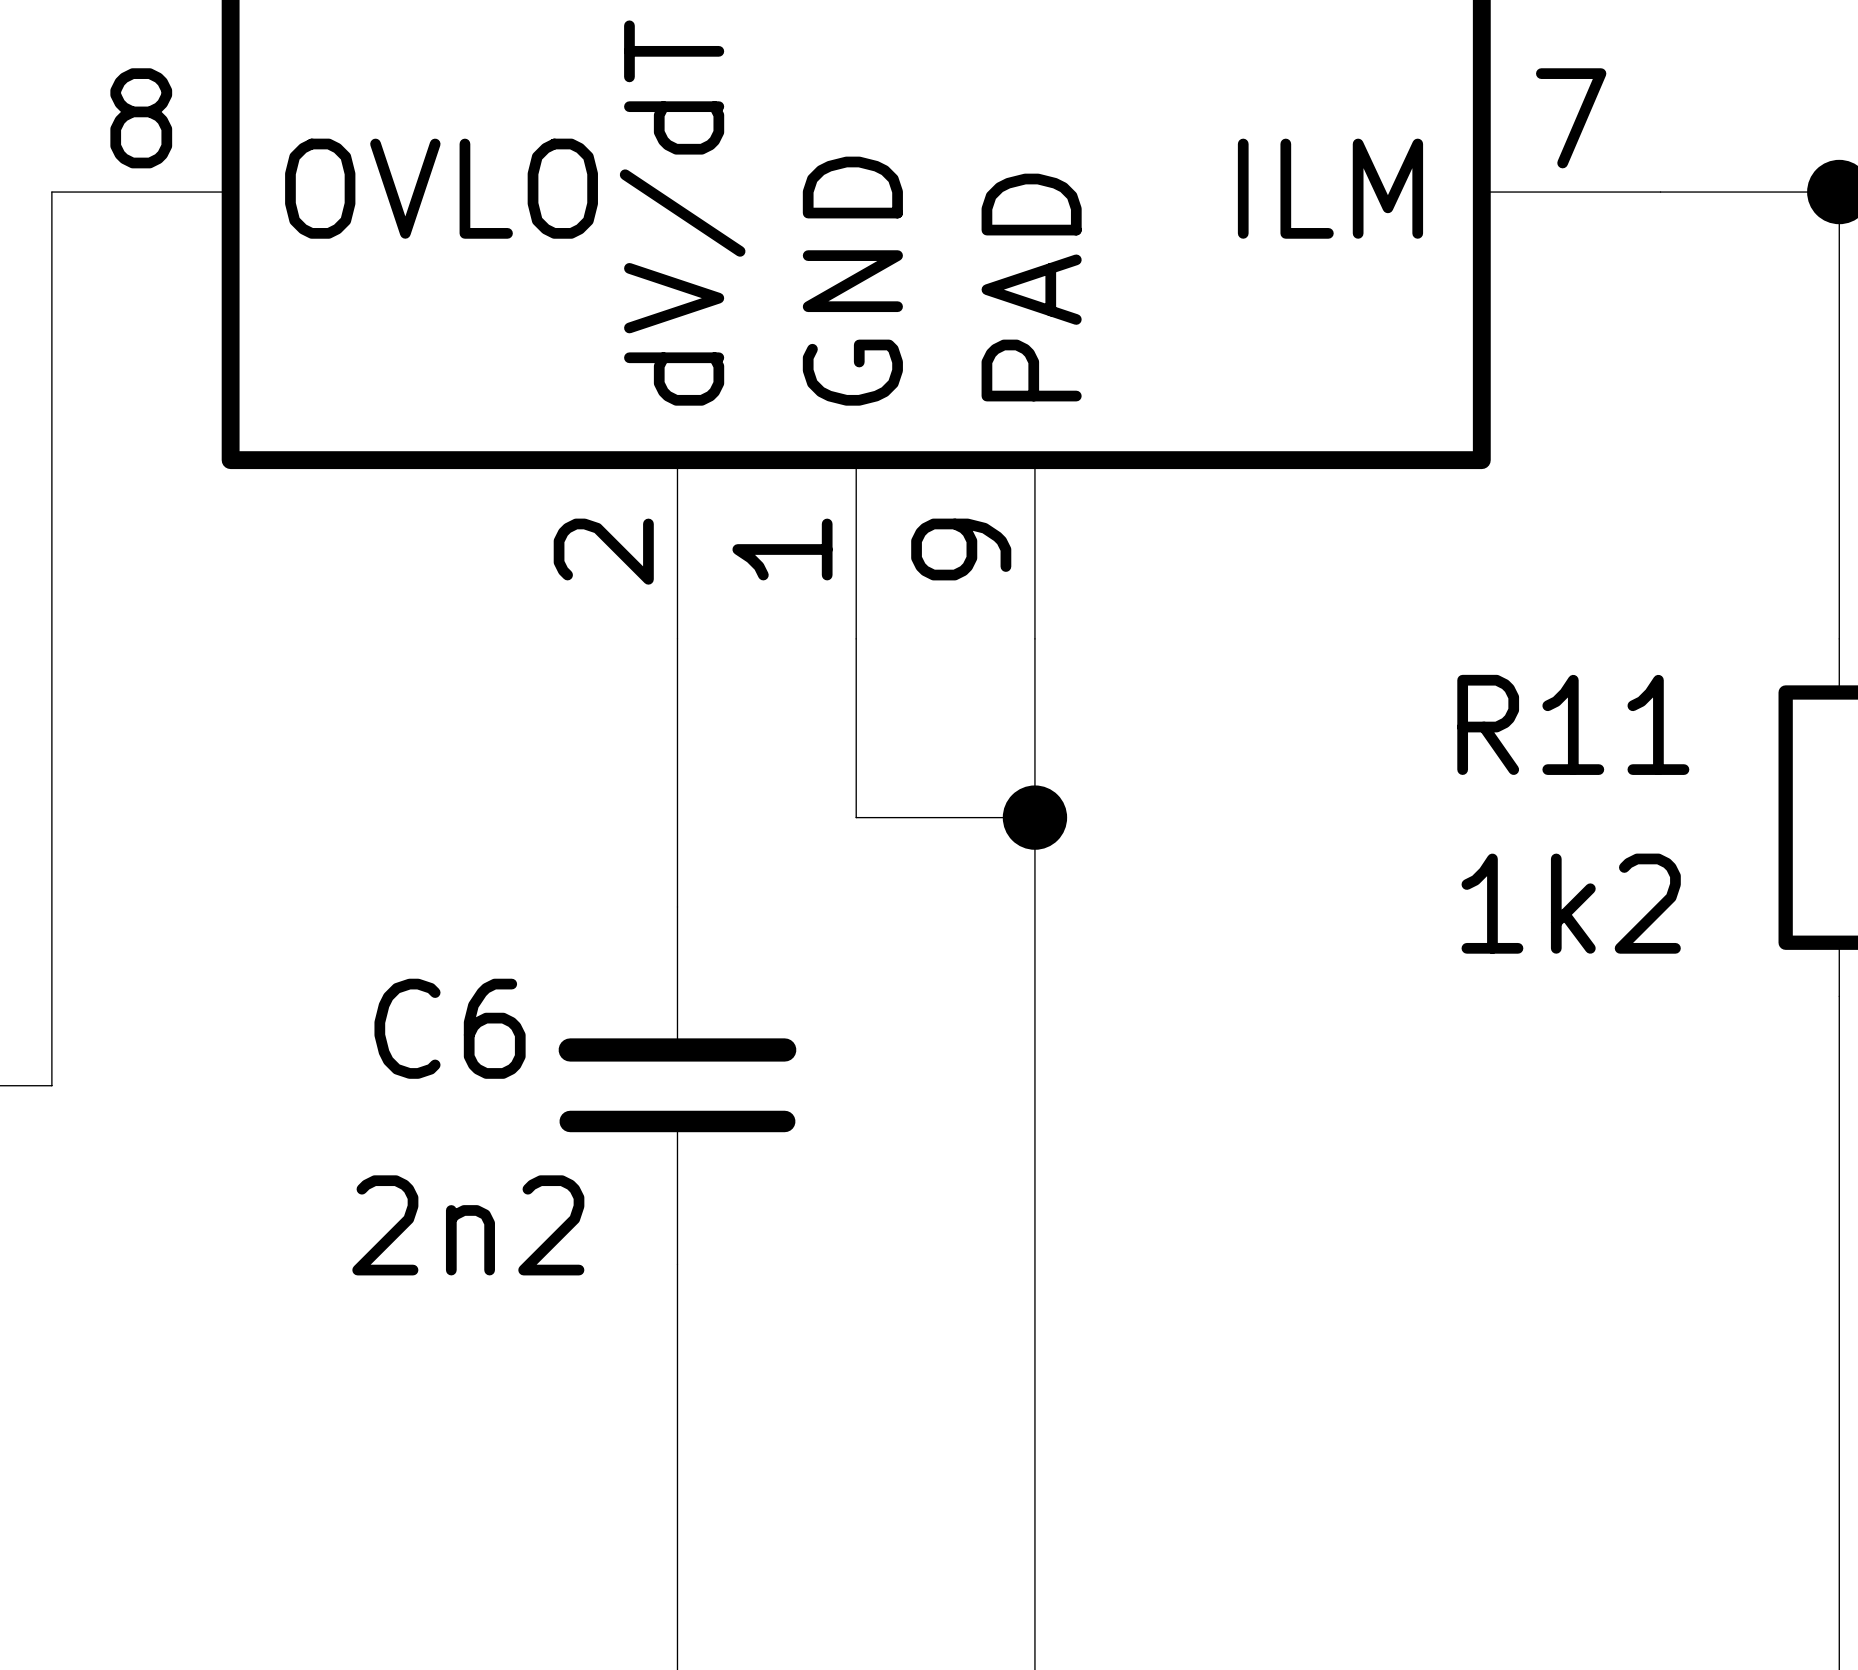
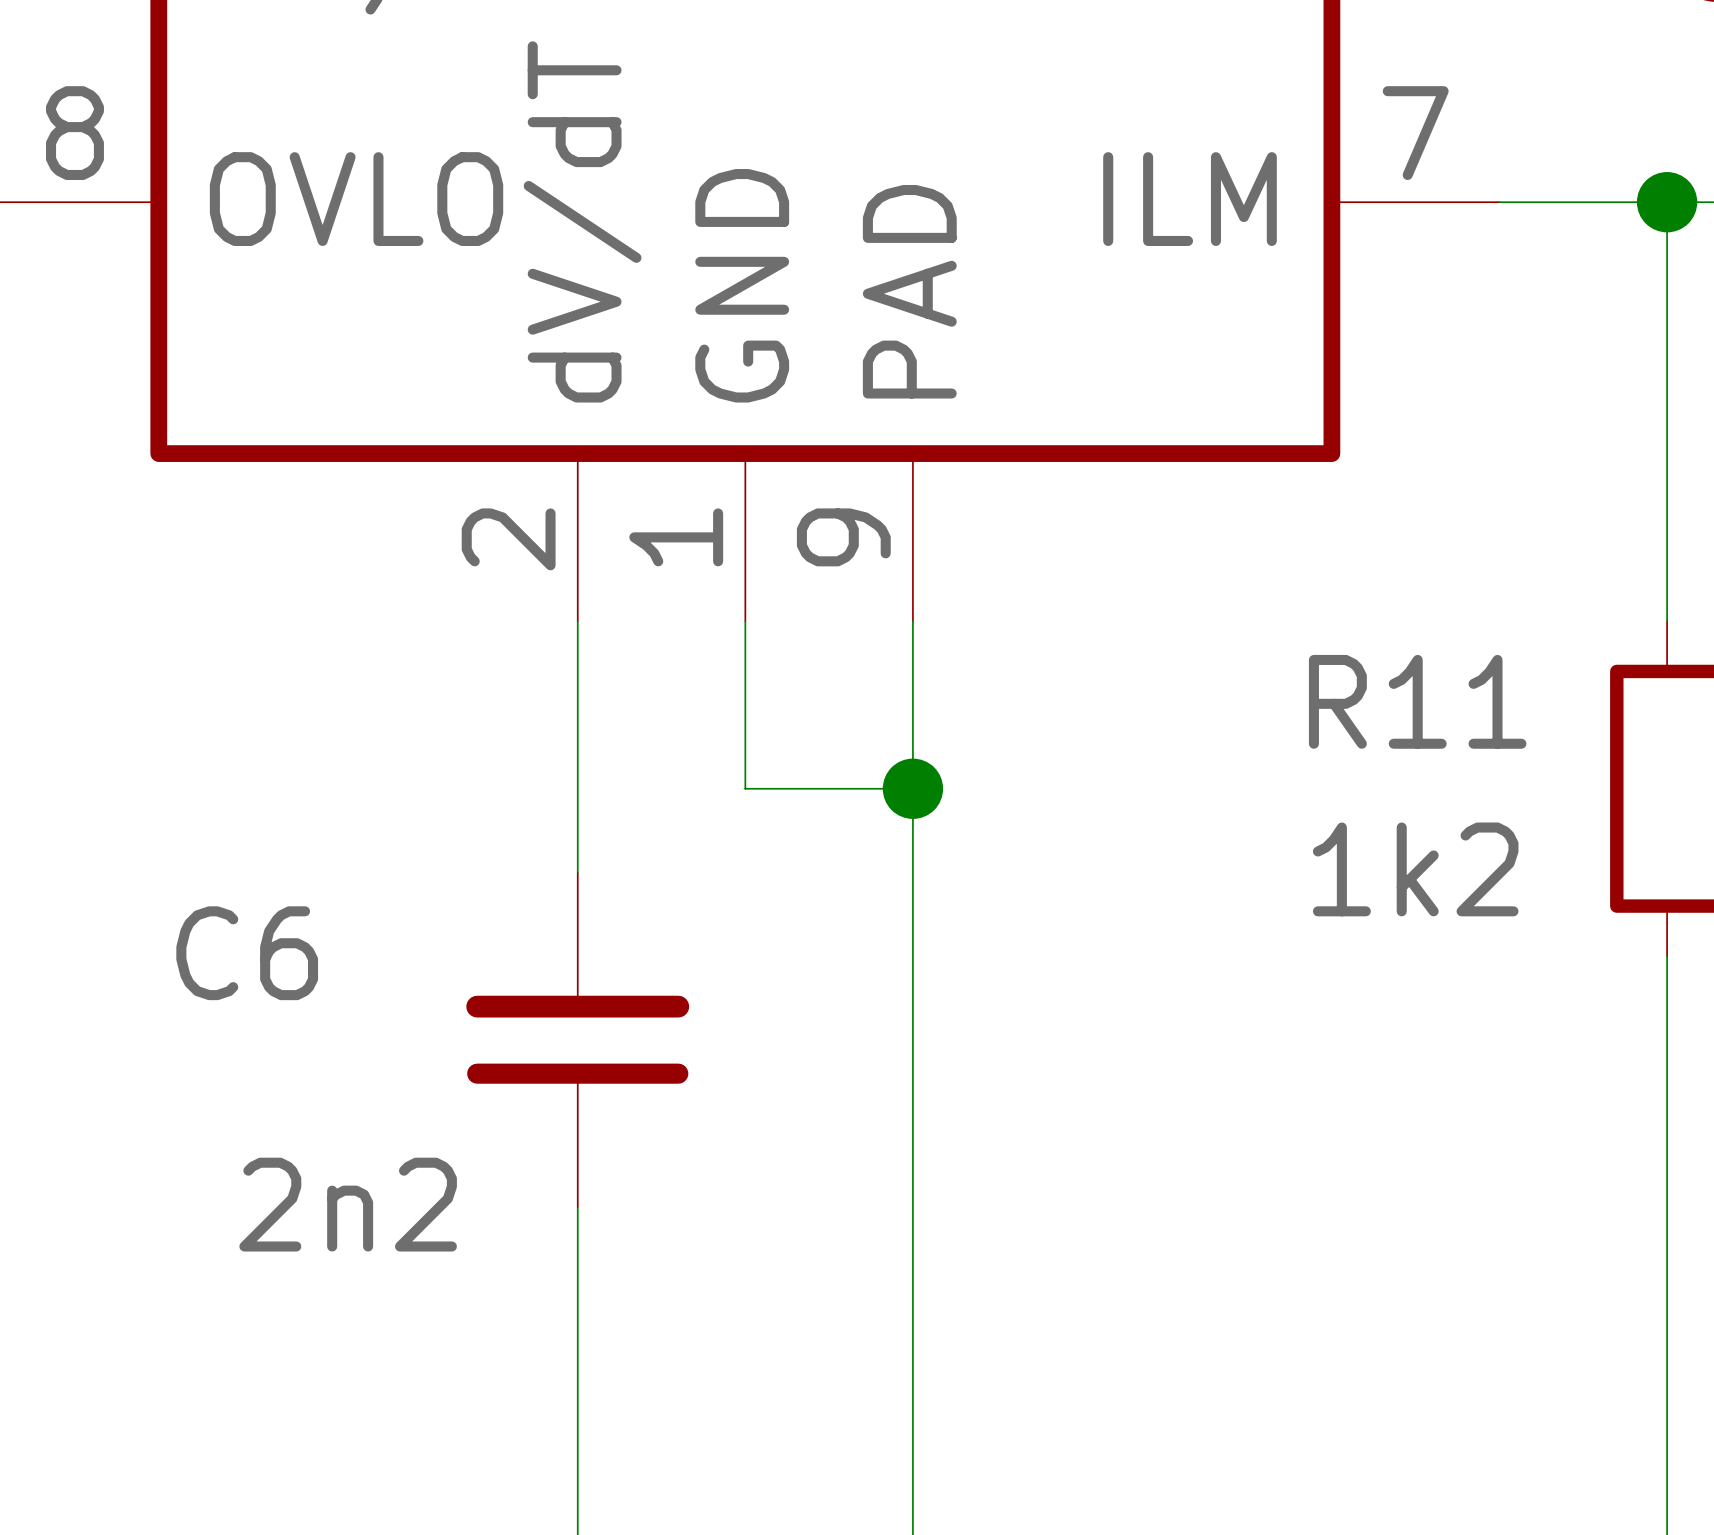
C6 name position: C6 (450, 1028) -> C6 (247, 953)
C6 value position: 2n2 (468, 1225) -> 2n2 (348, 1204)

